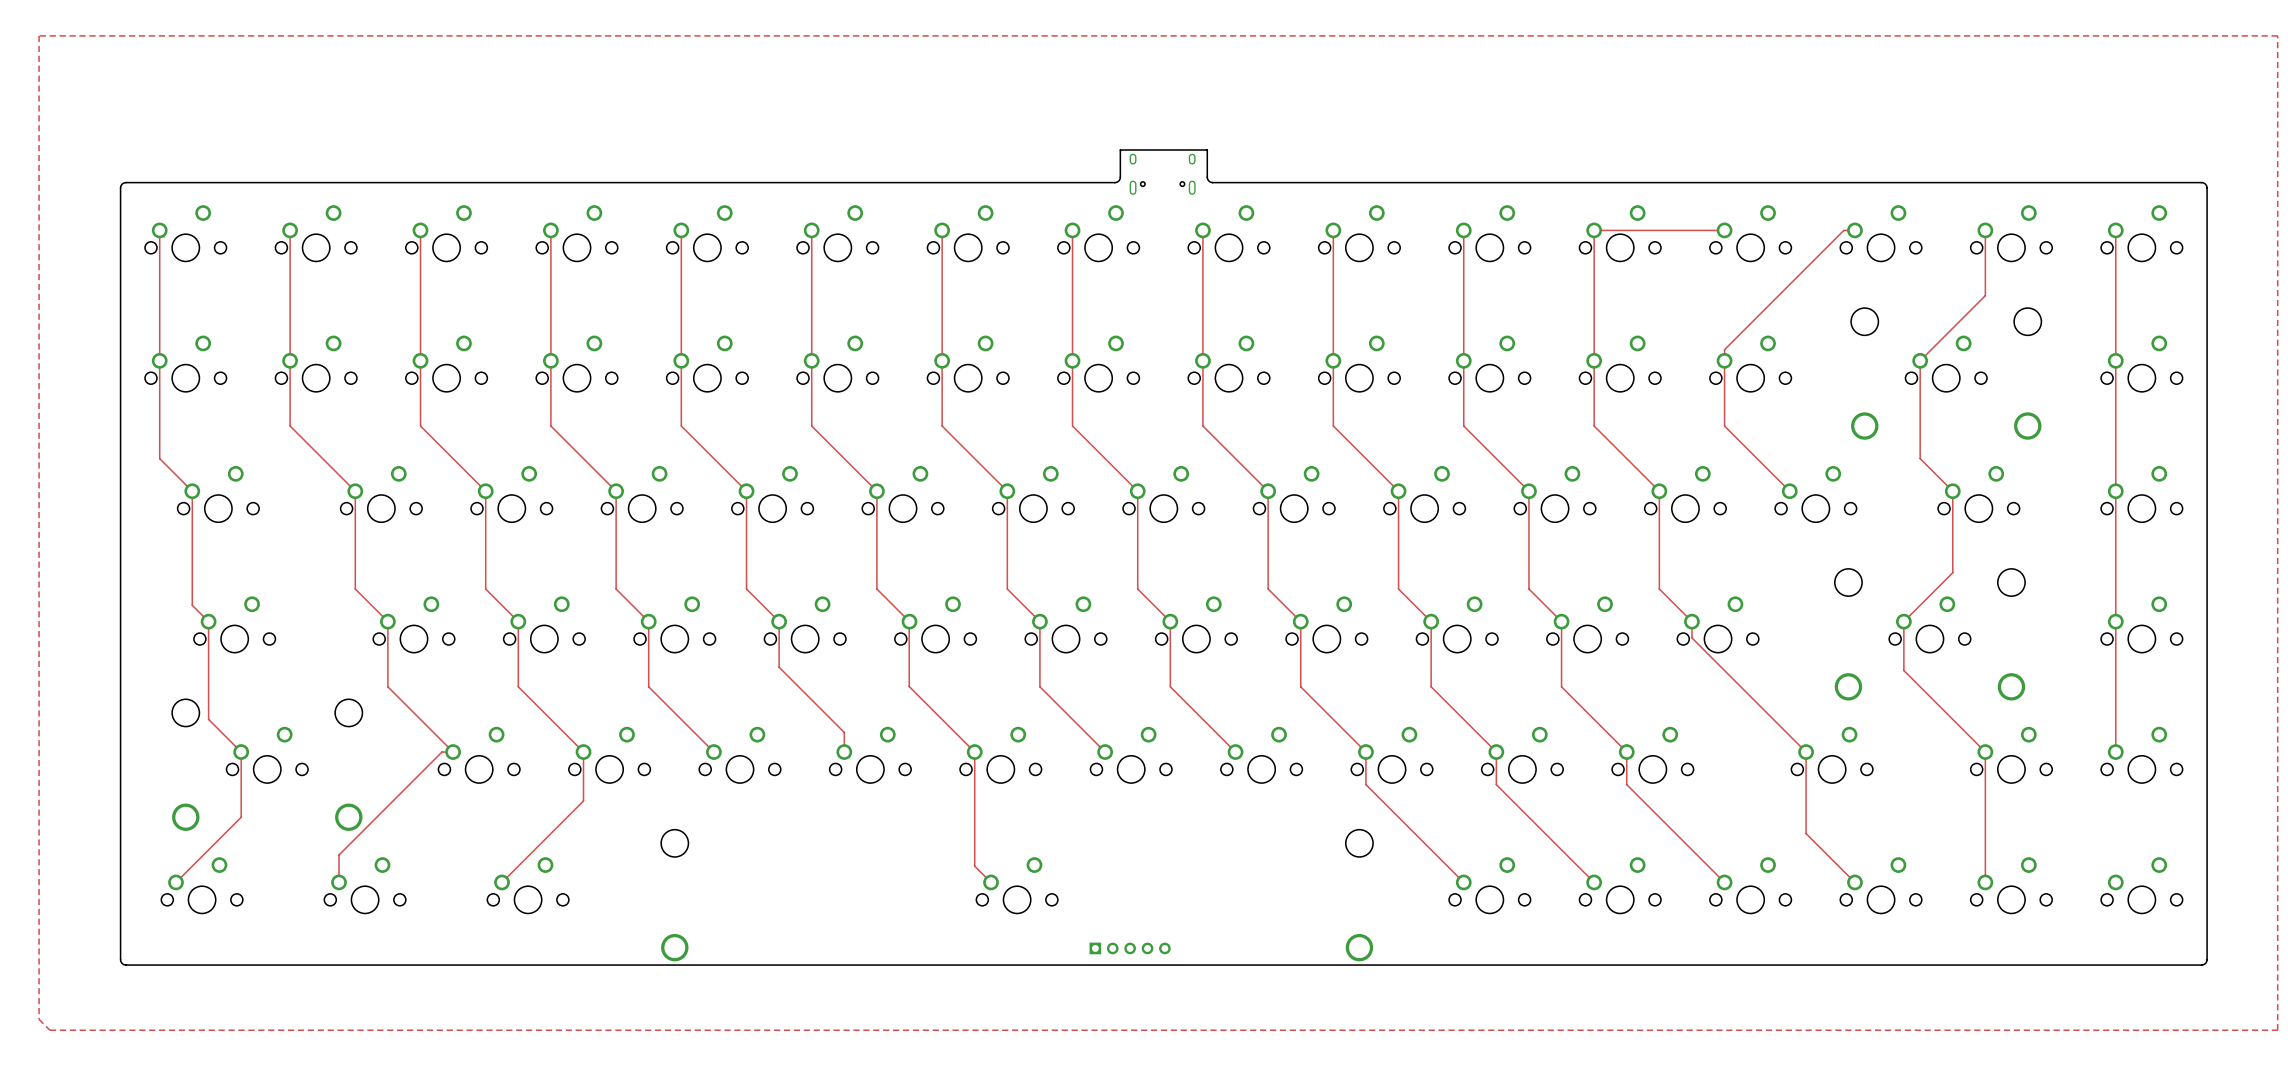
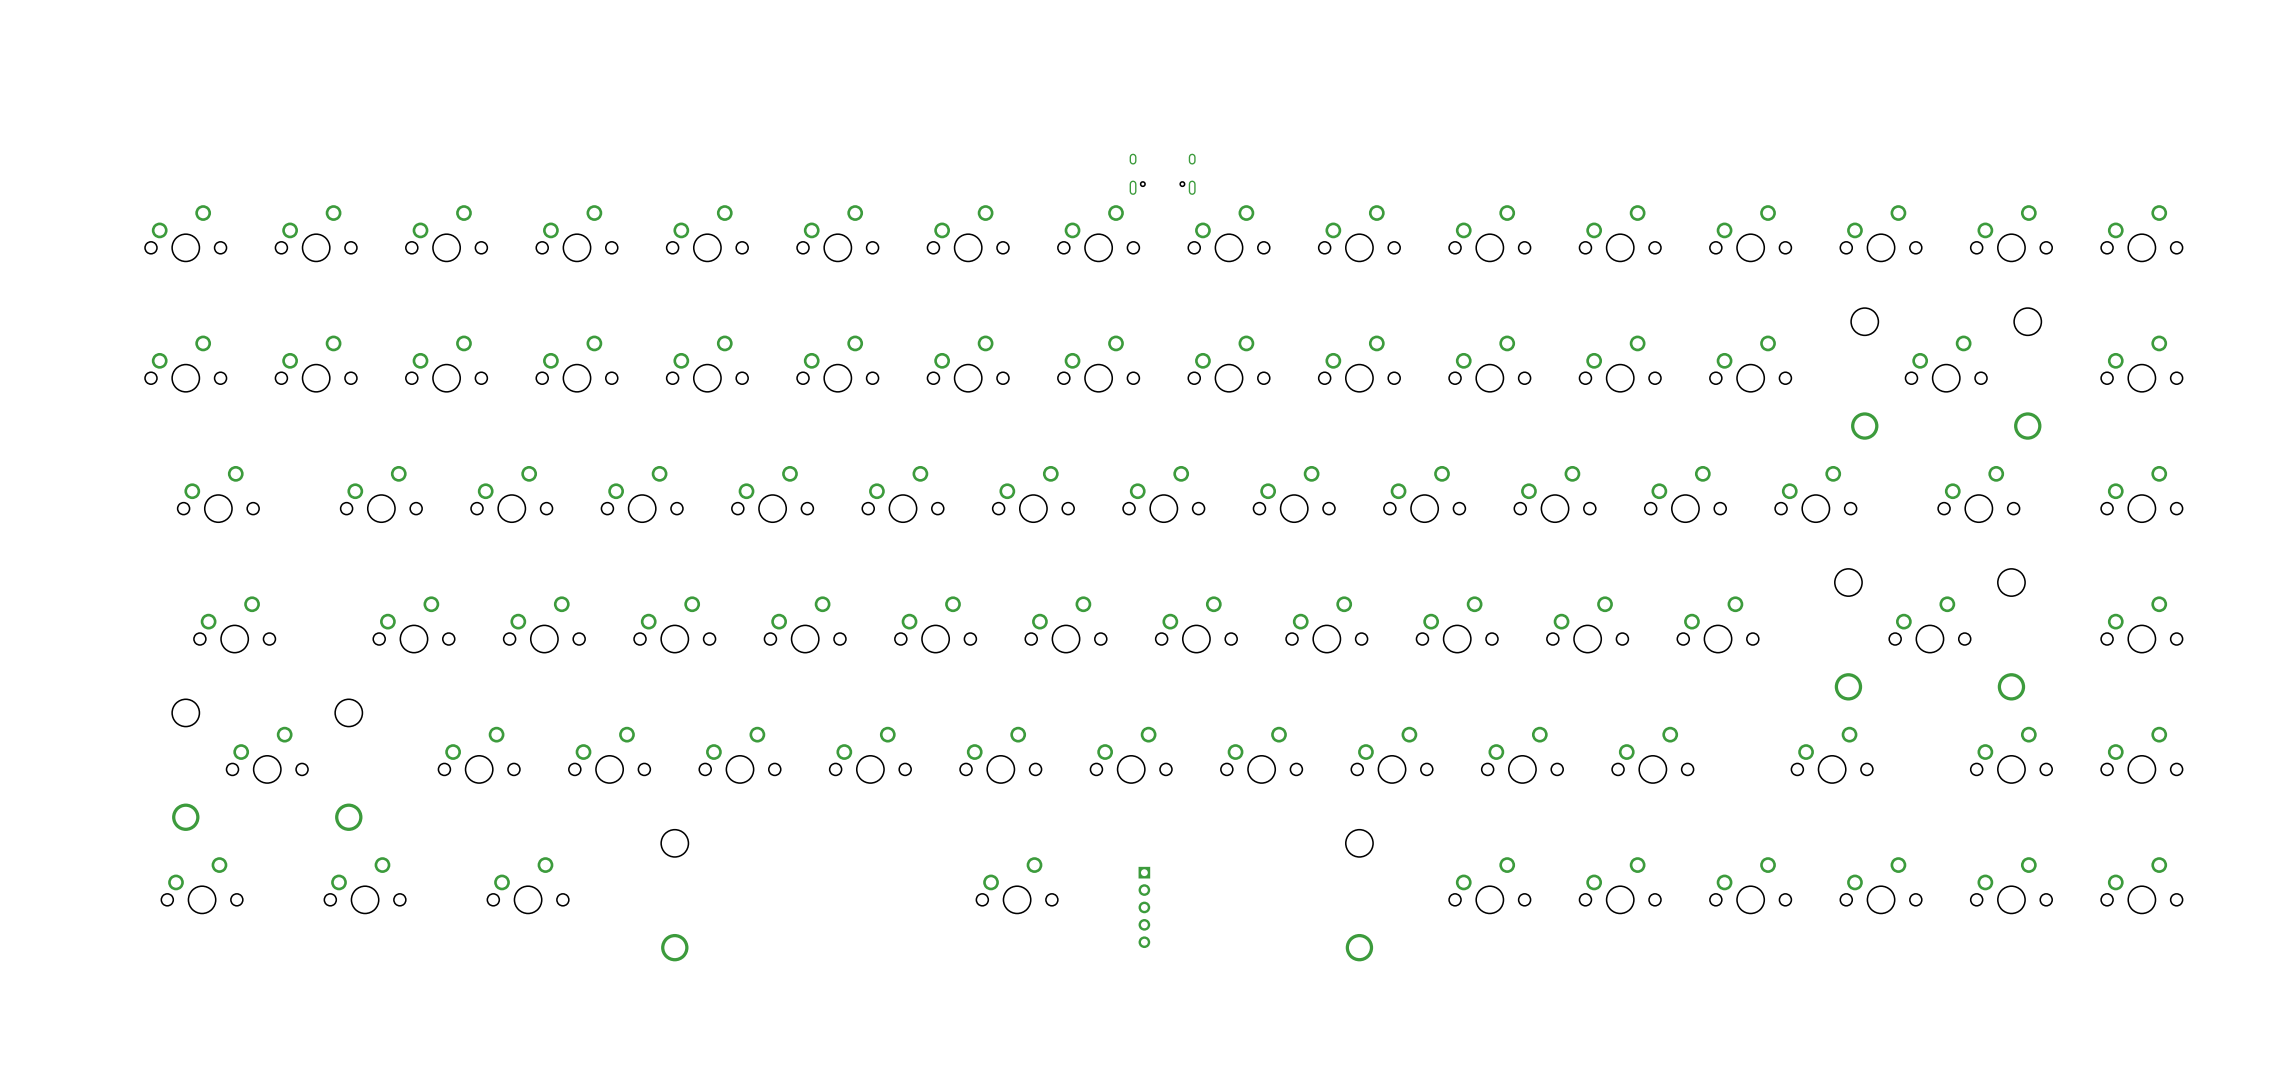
zone outline: (39, 35) (39, 1019) (49, 1030) (2277, 1030) (2277, 35) (39, 35) -> none
board edge: (1120, 150) (1207, 150) (1207, 177) (1212, 182) (2204, 183) (2207, 188) (2205, 962) (2201, 965) (126, 965) (121, 962) (120, 188) (122, 183) (1114, 182) (1120, 177) (1120, 150) -> none
track: (159, 230) (159, 458) (192, 491) (192, 605) (208, 621) (208, 719) (241, 752) (241, 817) (175, 882) -> none
track: (290, 230) (290, 426) (355, 491) (355, 589) (387, 621) (387, 686) (453, 752) (441, 752) (339, 855) (339, 882) -> none
track: (420, 230) (420, 426) (485, 491) (485, 589) (518, 621) (518, 686) (583, 752) (583, 800) (502, 882) -> none
track: (550, 230) (550, 426) (616, 491) (616, 589) (648, 621) (648, 686) (713, 752) -> none
track: (681, 230) (681, 426) (746, 491) (746, 589) (779, 621) (779, 667) (844, 732) (844, 752) -> none
track: (811, 230) (811, 426) (876, 491) (876, 589) (909, 621) (909, 686) (974, 752) (974, 866) (991, 882) -> none
track: (942, 230) (942, 426) (1007, 491) (1007, 589) (1039, 621) (1039, 686) (1105, 752) -> none
track: (1072, 230) (1072, 426) (1137, 491) (1137, 589) (1170, 621) (1170, 686) (1235, 752) -> none
track: (1202, 230) (1202, 426) (1268, 491) (1268, 589) (1300, 621) (1300, 686) (1365, 752) (1365, 784) (1463, 882) -> none
track: (1333, 230) (1333, 426) (1398, 491) (1398, 589) (1431, 621) (1431, 686) (1496, 752) (1496, 784) (1594, 882) -> none
track: (1463, 230) (1463, 426) (1528, 491) (1528, 589) (1561, 621) (1561, 686) (1626, 752) (1626, 784) (1724, 882) -> none
track: (1724, 230) (1594, 230) (1594, 426) (1659, 491) (1659, 589) (1691, 621) (1691, 637) (1806, 752) (1806, 833) (1854, 882) -> none
track: (1854, 230) (1843, 230) (1724, 349) (1724, 426) (1789, 491) -> none
track: (1985, 230) (1985, 295) (1920, 360) (1920, 458) (1952, 491) (1952, 572) (1903, 621) (1903, 670) (1985, 752) (1985, 882) -> none
track: (2115, 230) (2115, 752) -> none
part rotation: 0° (1130, 948) -> 90° clockwise (1144, 907)

